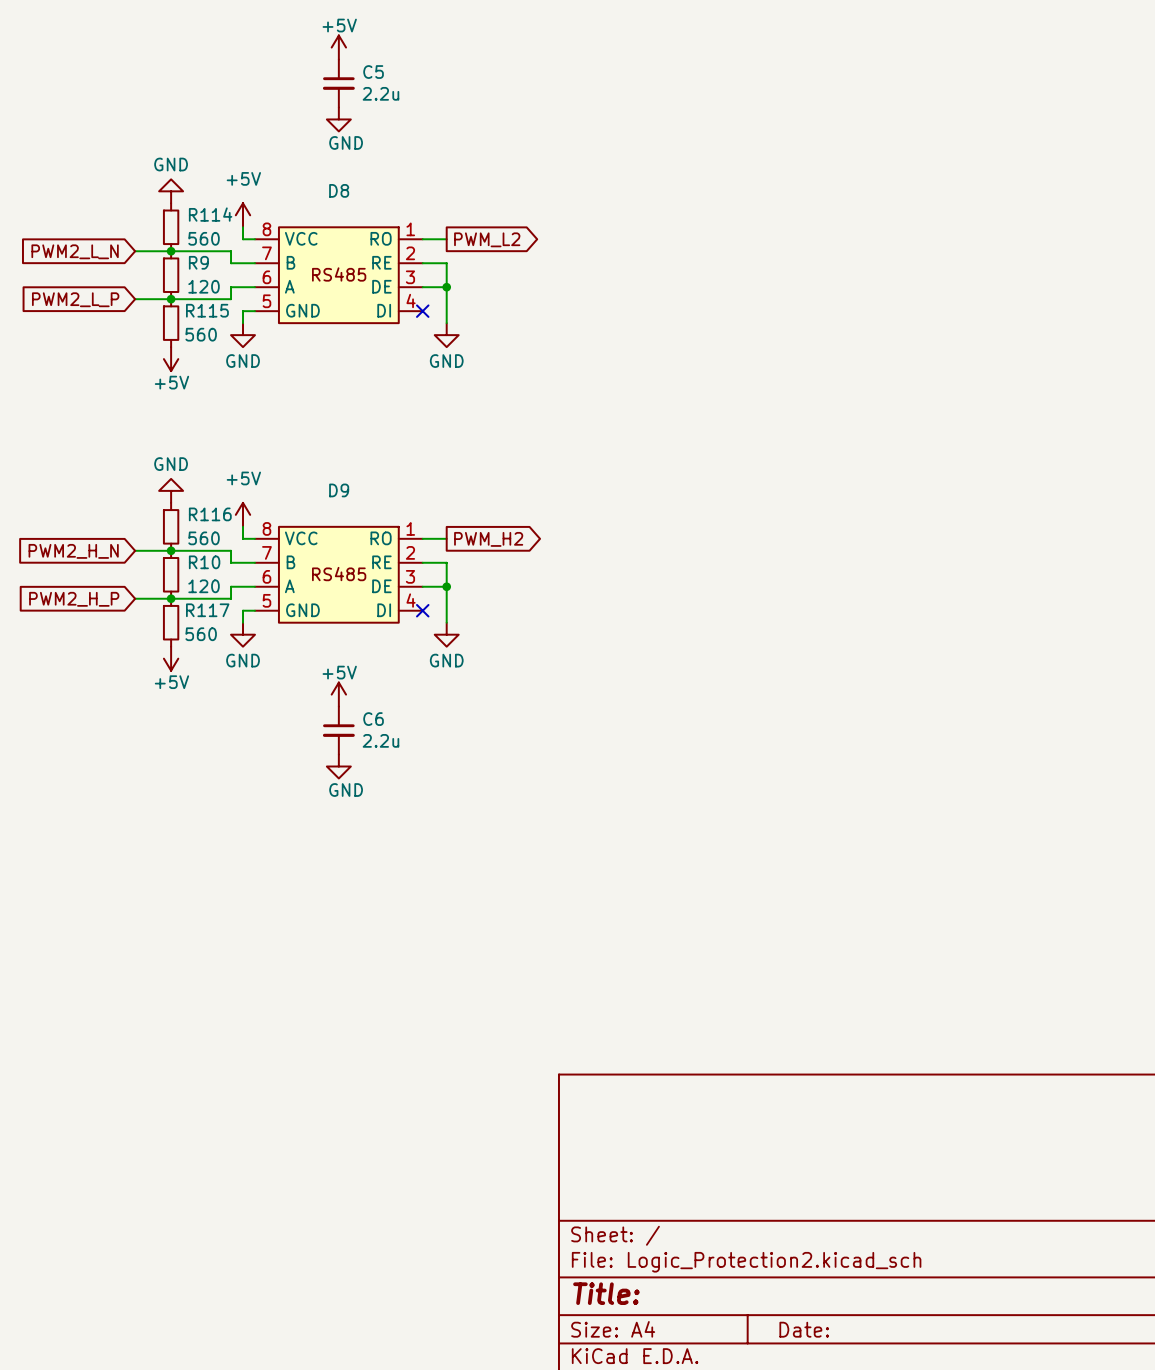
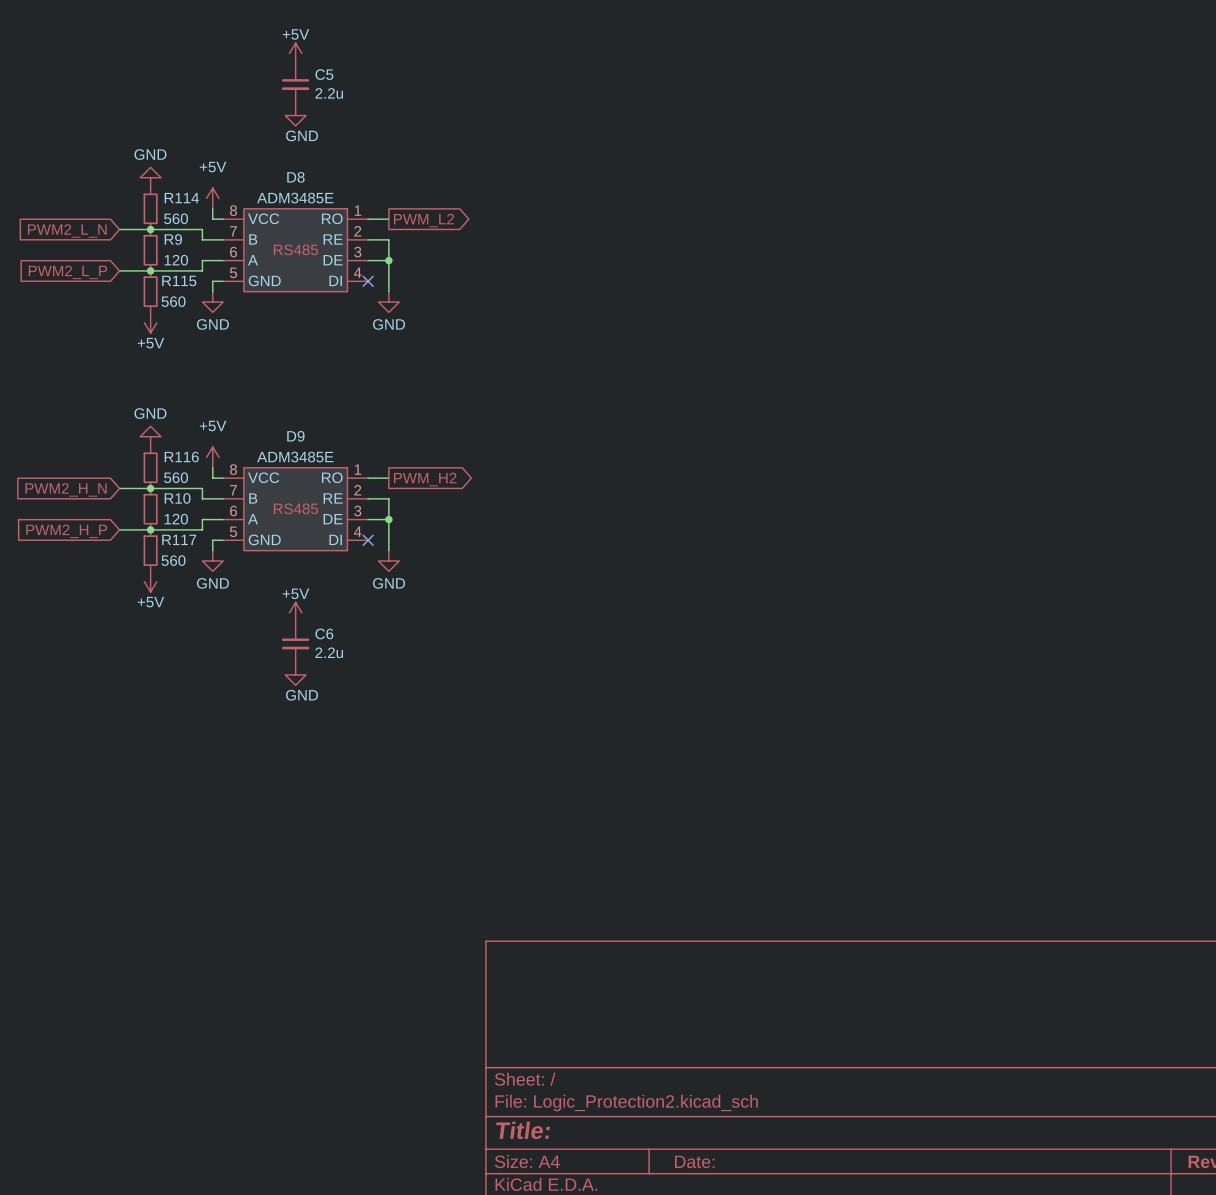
D8 value: none -> ADM3485E (295, 198)
D9 value: none -> ADM3485E (295, 457)

